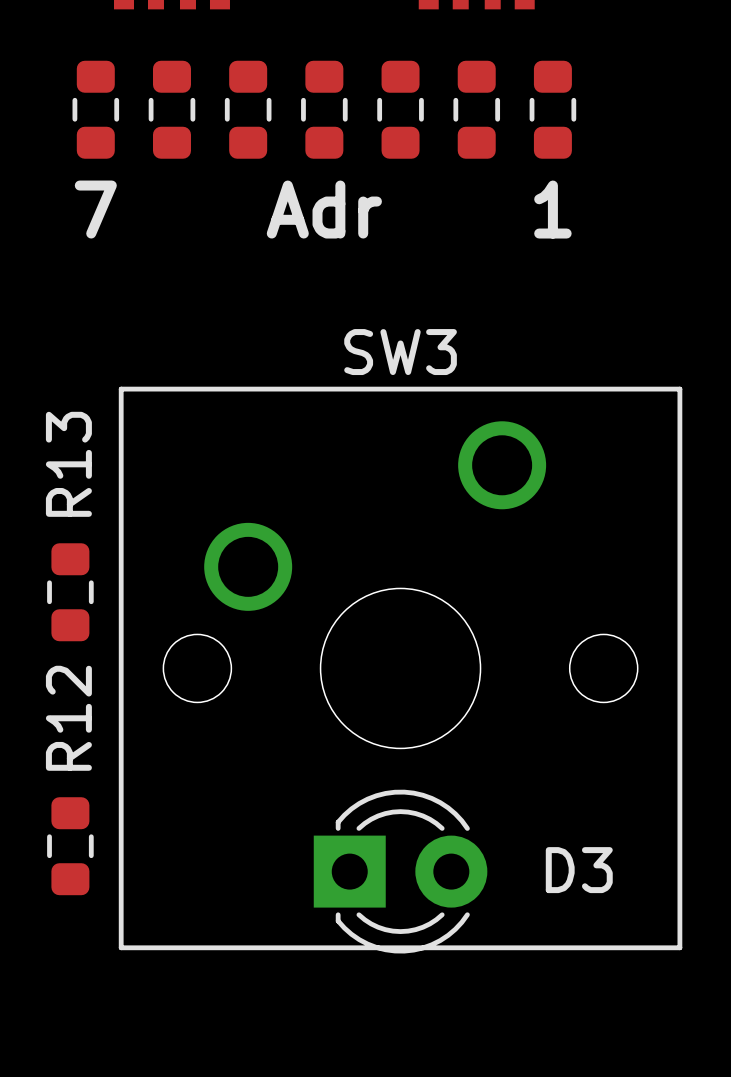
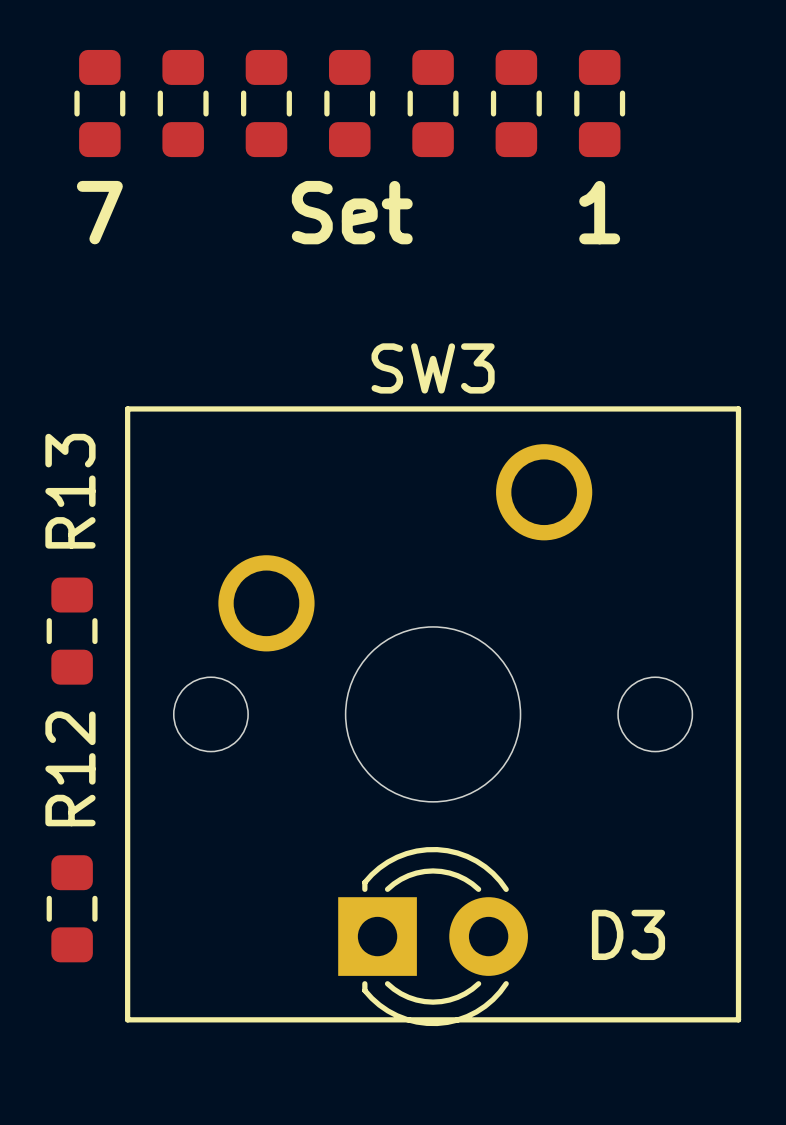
text: Adr (324, 209) -> Set (352, 212)

